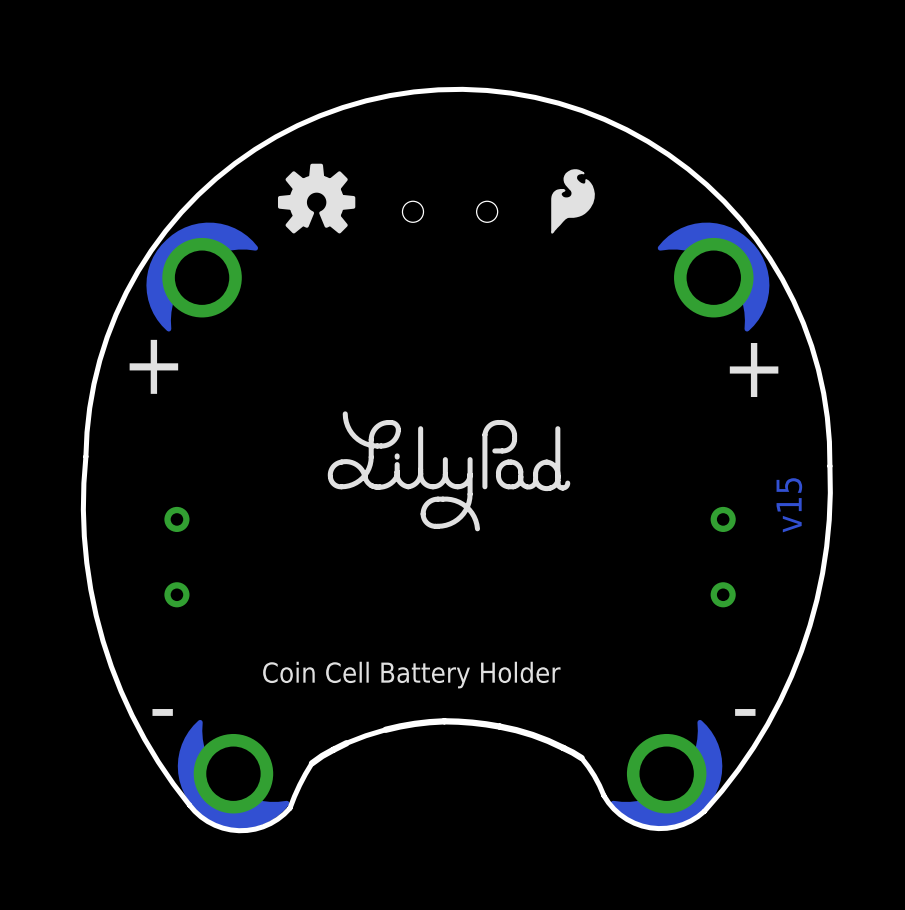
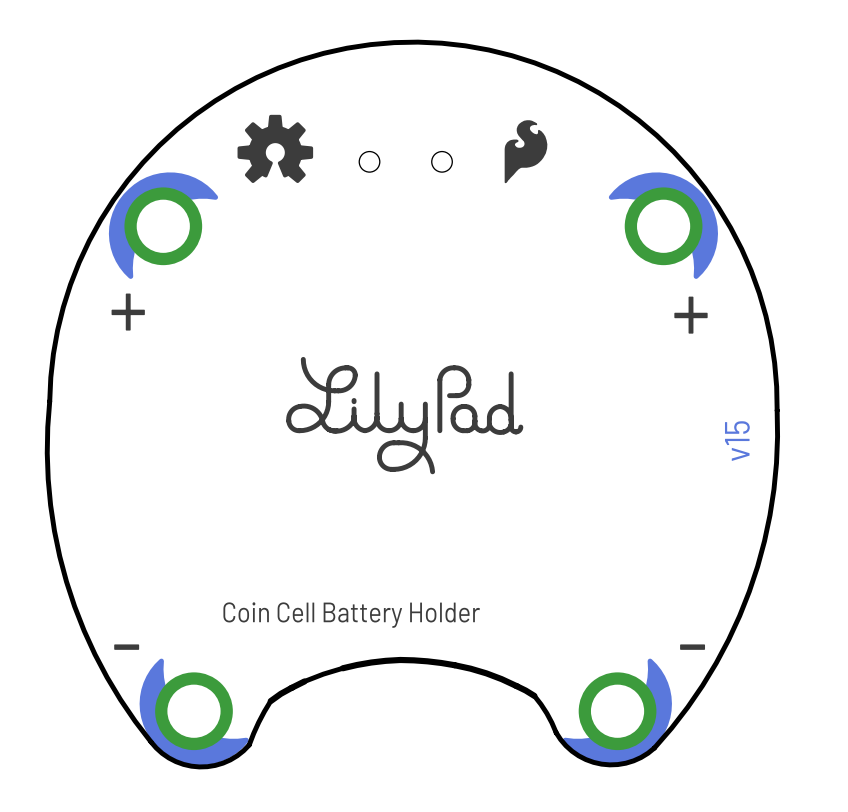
via: (176, 519) -> none
via: (723, 519) -> none
via: (176, 594) -> none
via: (723, 594) -> none

